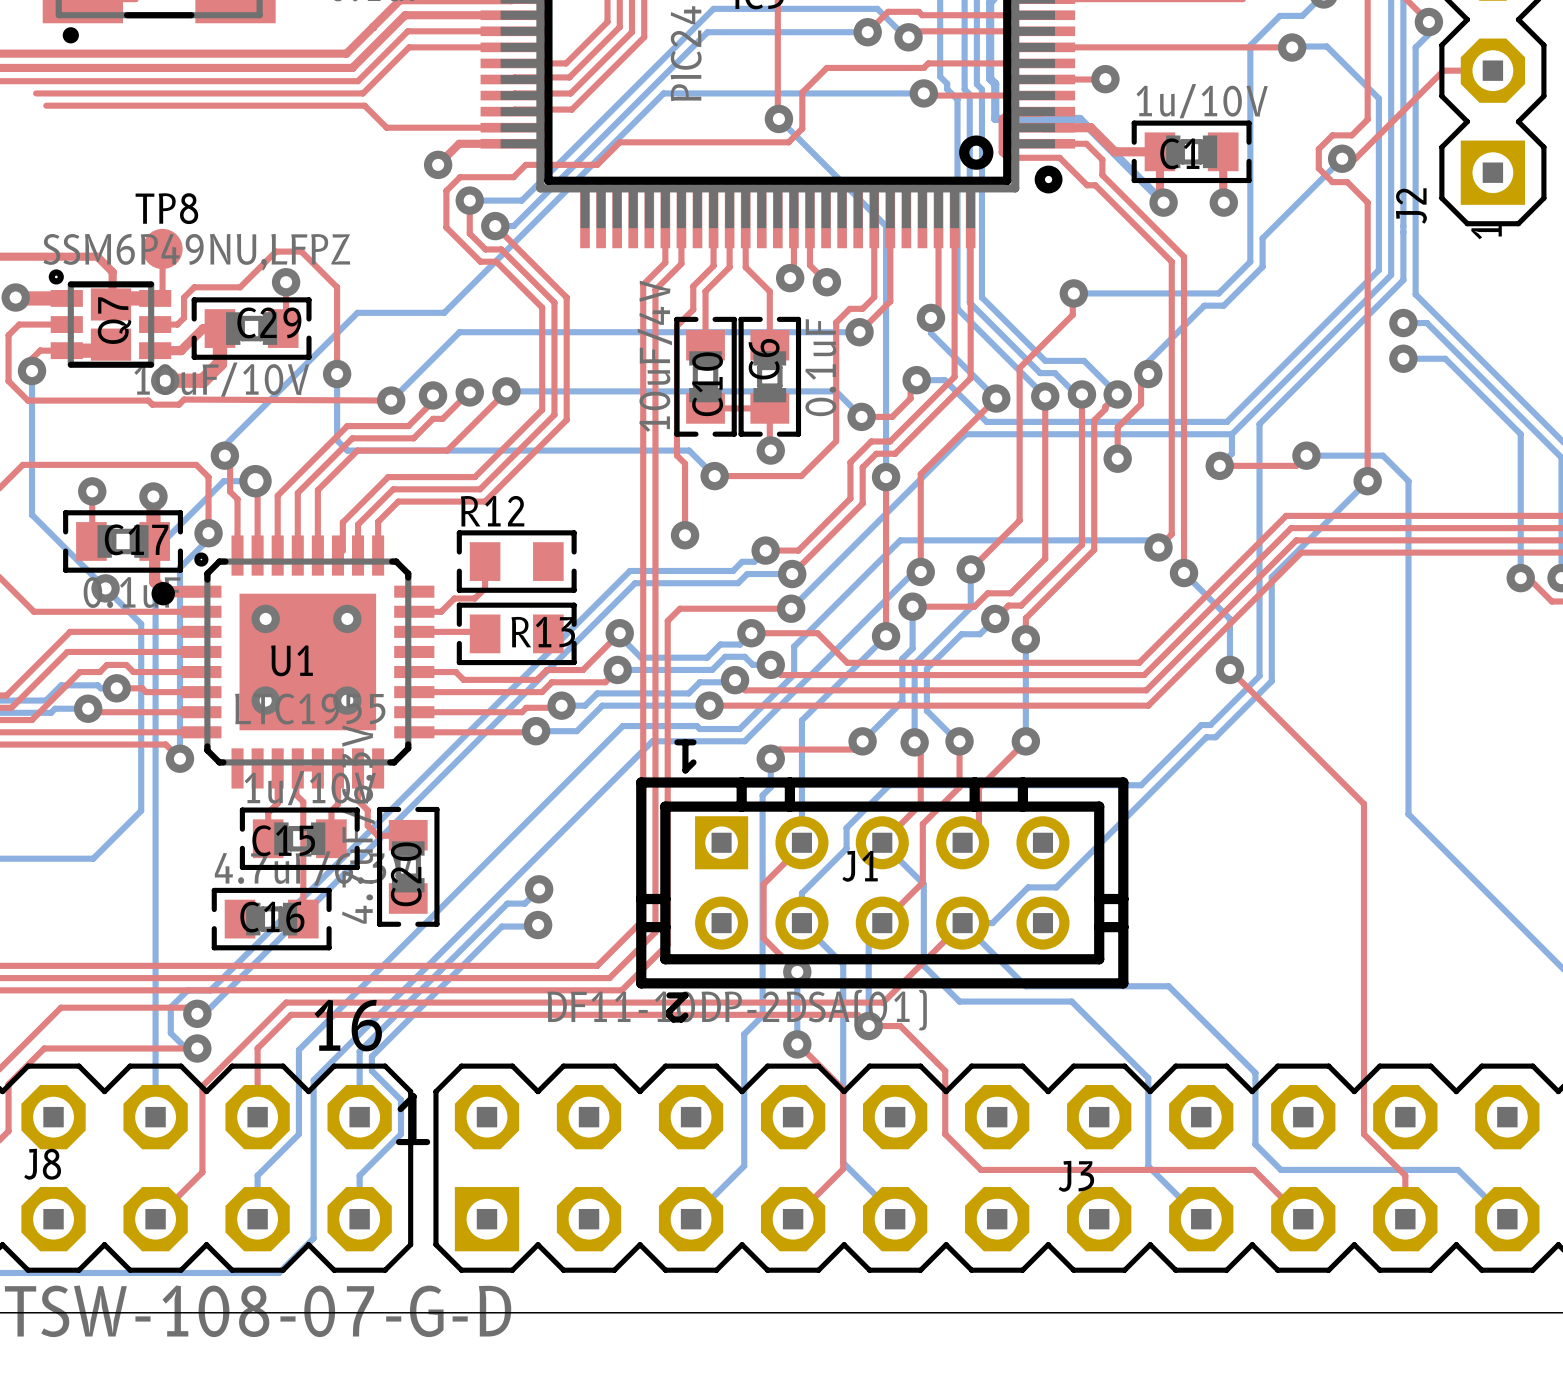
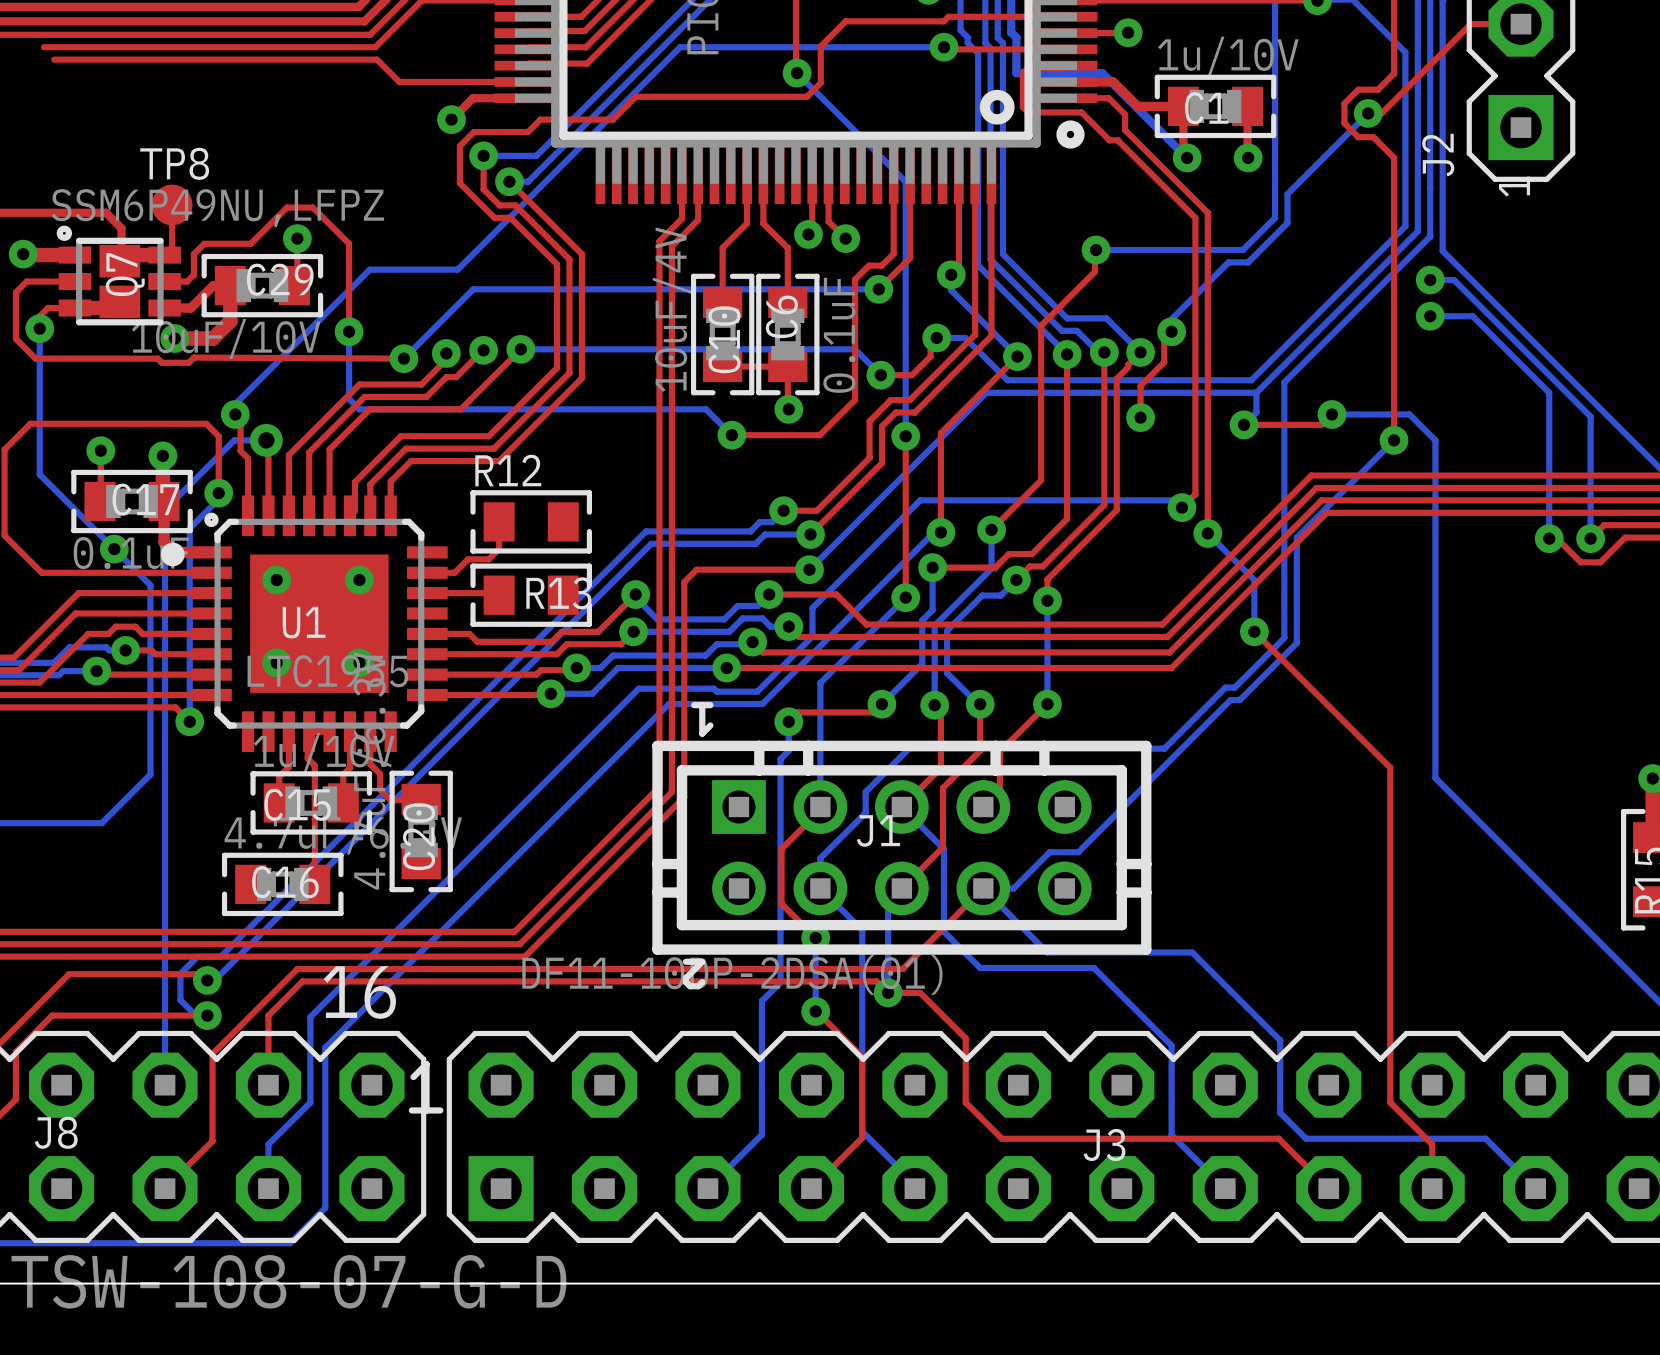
top track: (713, 216) (713, 265) (693, 286) (693, 309) (676, 326) (676, 455) (685, 463) (685, 535) -> none
via: (685, 535) -> none
top track: (643, 823) (643, 919) (597, 965) (500, 965) -> (659, 786) (514, 931)
top track: (655, 828) (655, 932) (609, 978) (505, 978) -> (671, 792) (519, 944)
top track: (667, 833) (667, 944) (621, 990) (510, 990) -> (684, 797) (524, 956)
bottom track: (539, 889) (524, 903) (507, 903) (359, 1051) (359, 1117) -> none
via: (539, 889) -> none
bottom track: (538, 925) (501, 926) (371, 1056) (371, 1070) (400, 1100) (400, 1134) (359, 1175) (359, 1219) -> none
via: (538, 925) -> none

